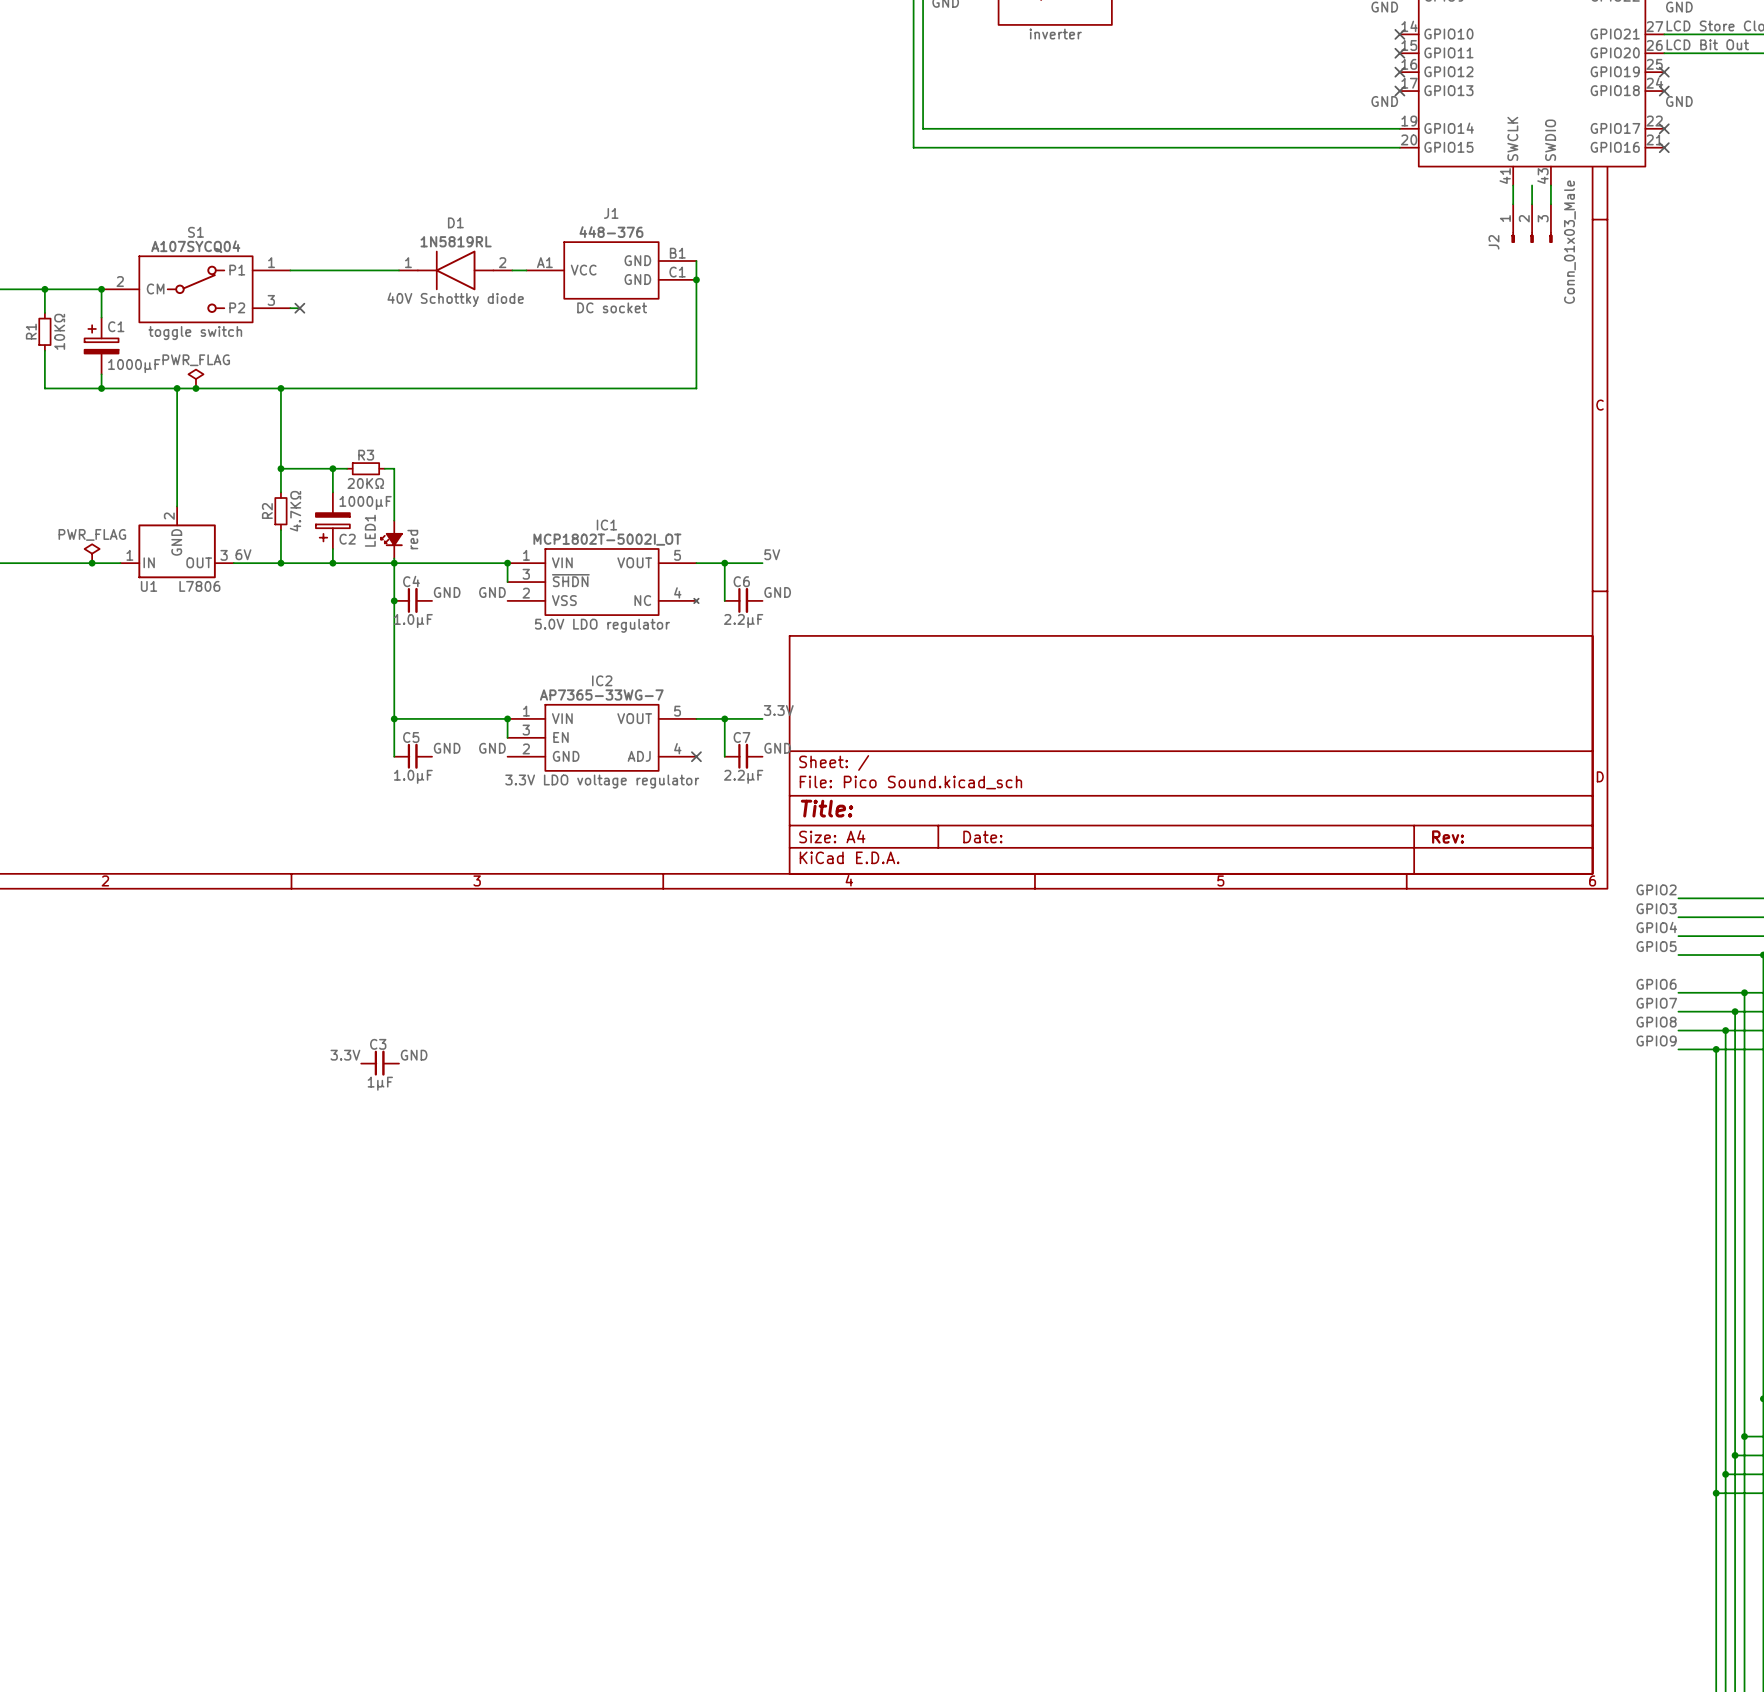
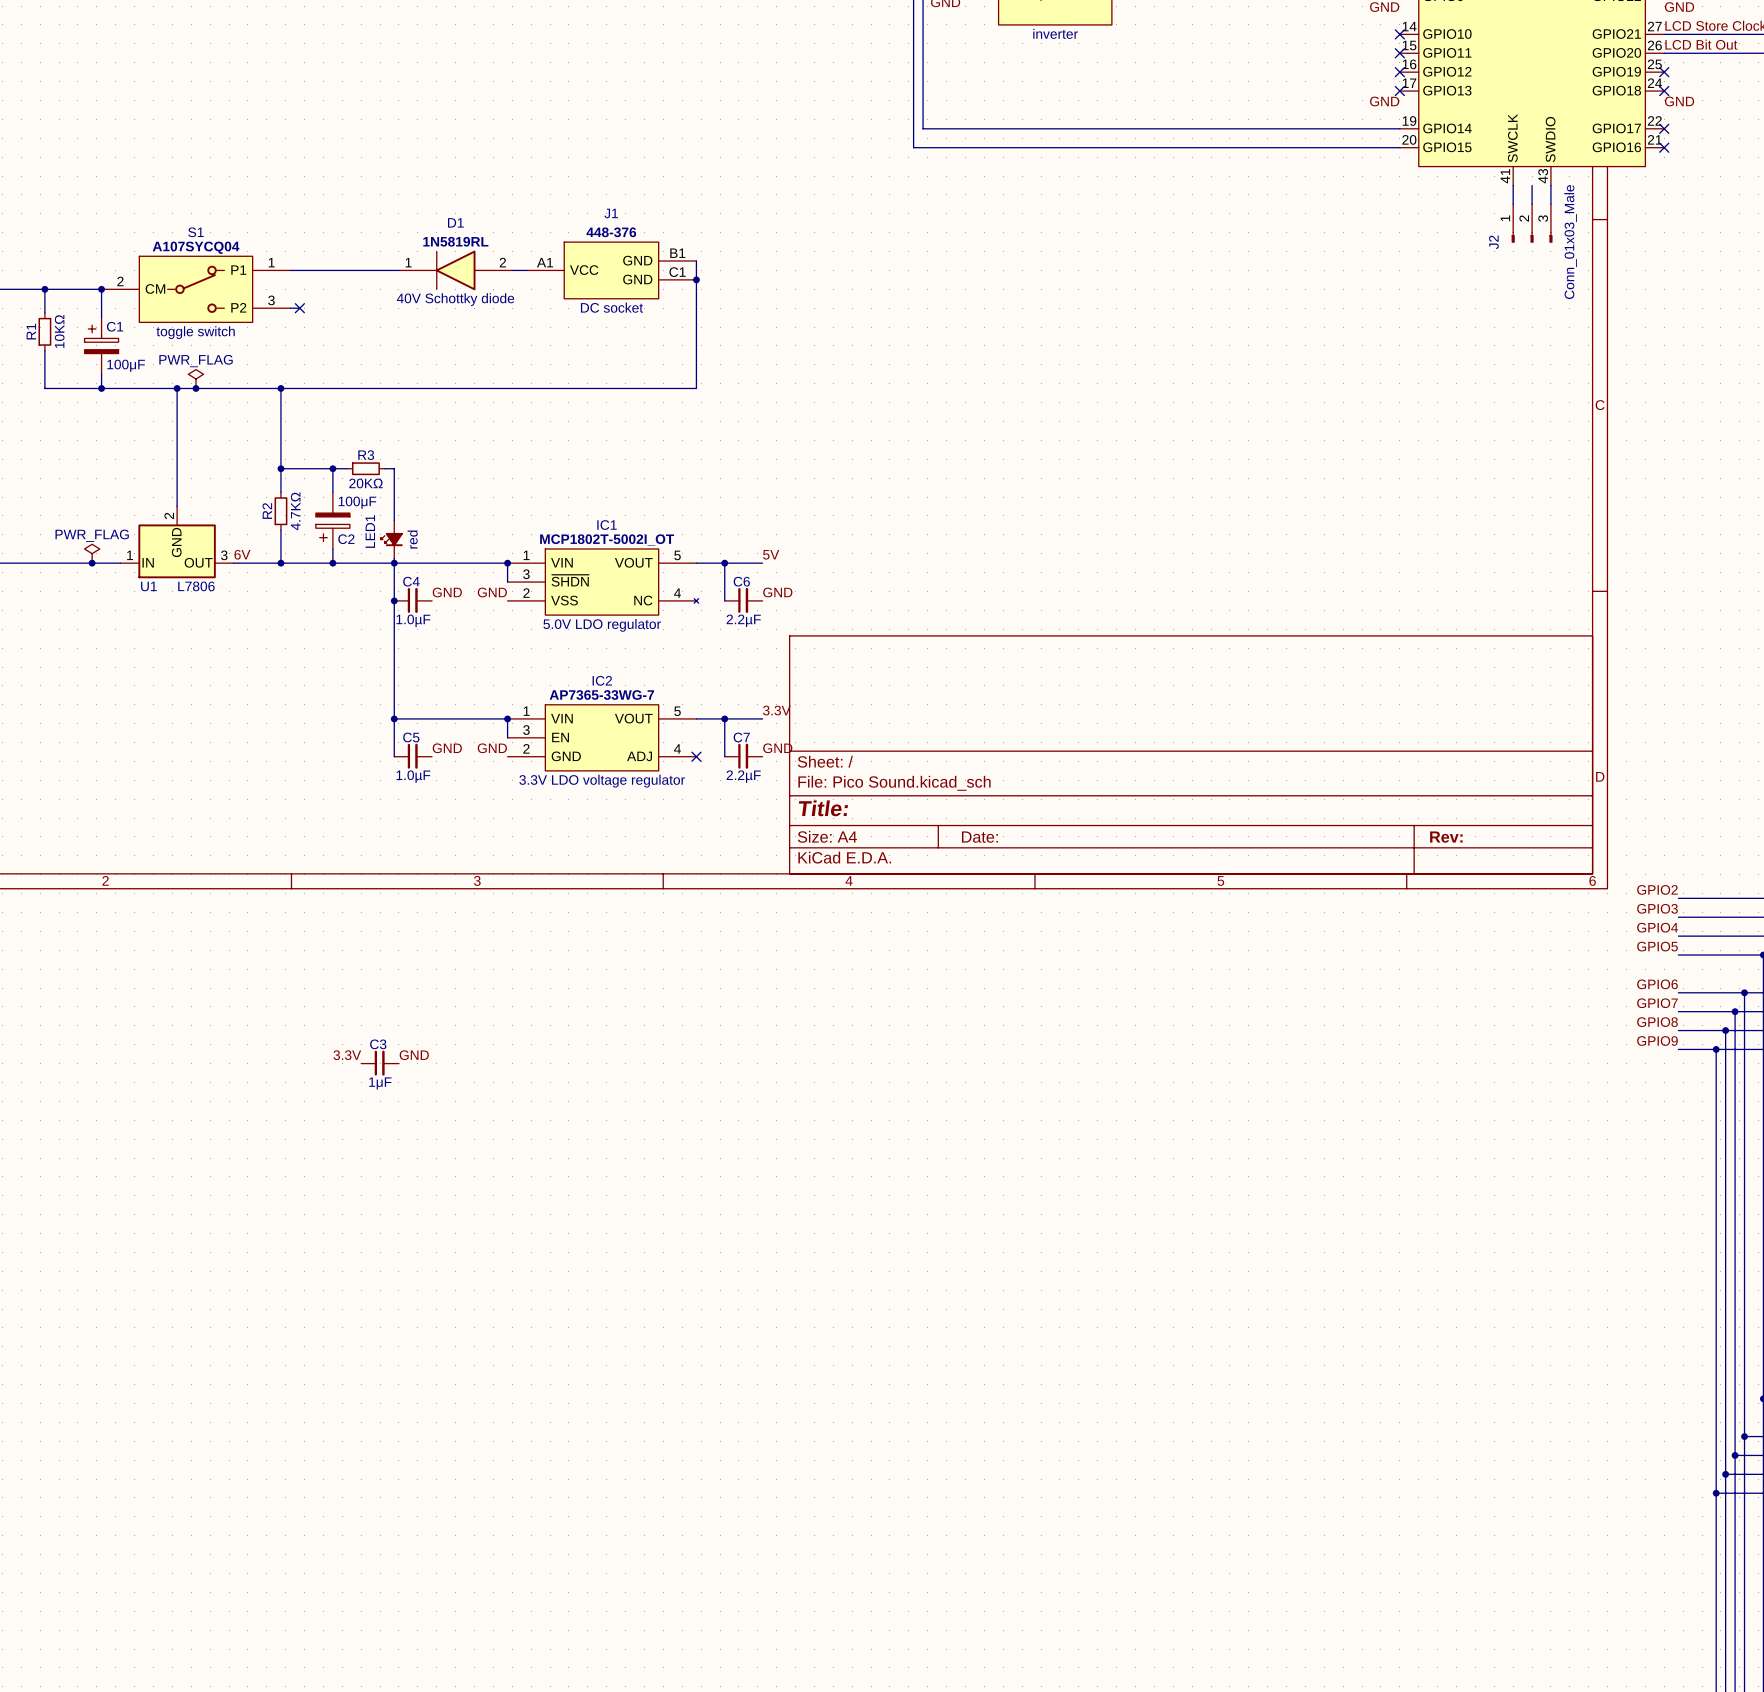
C1 text: 1000μF (134, 366) -> 100μF (126, 365)
C2 text: 1000μF (365, 503) -> 100μF (357, 502)

